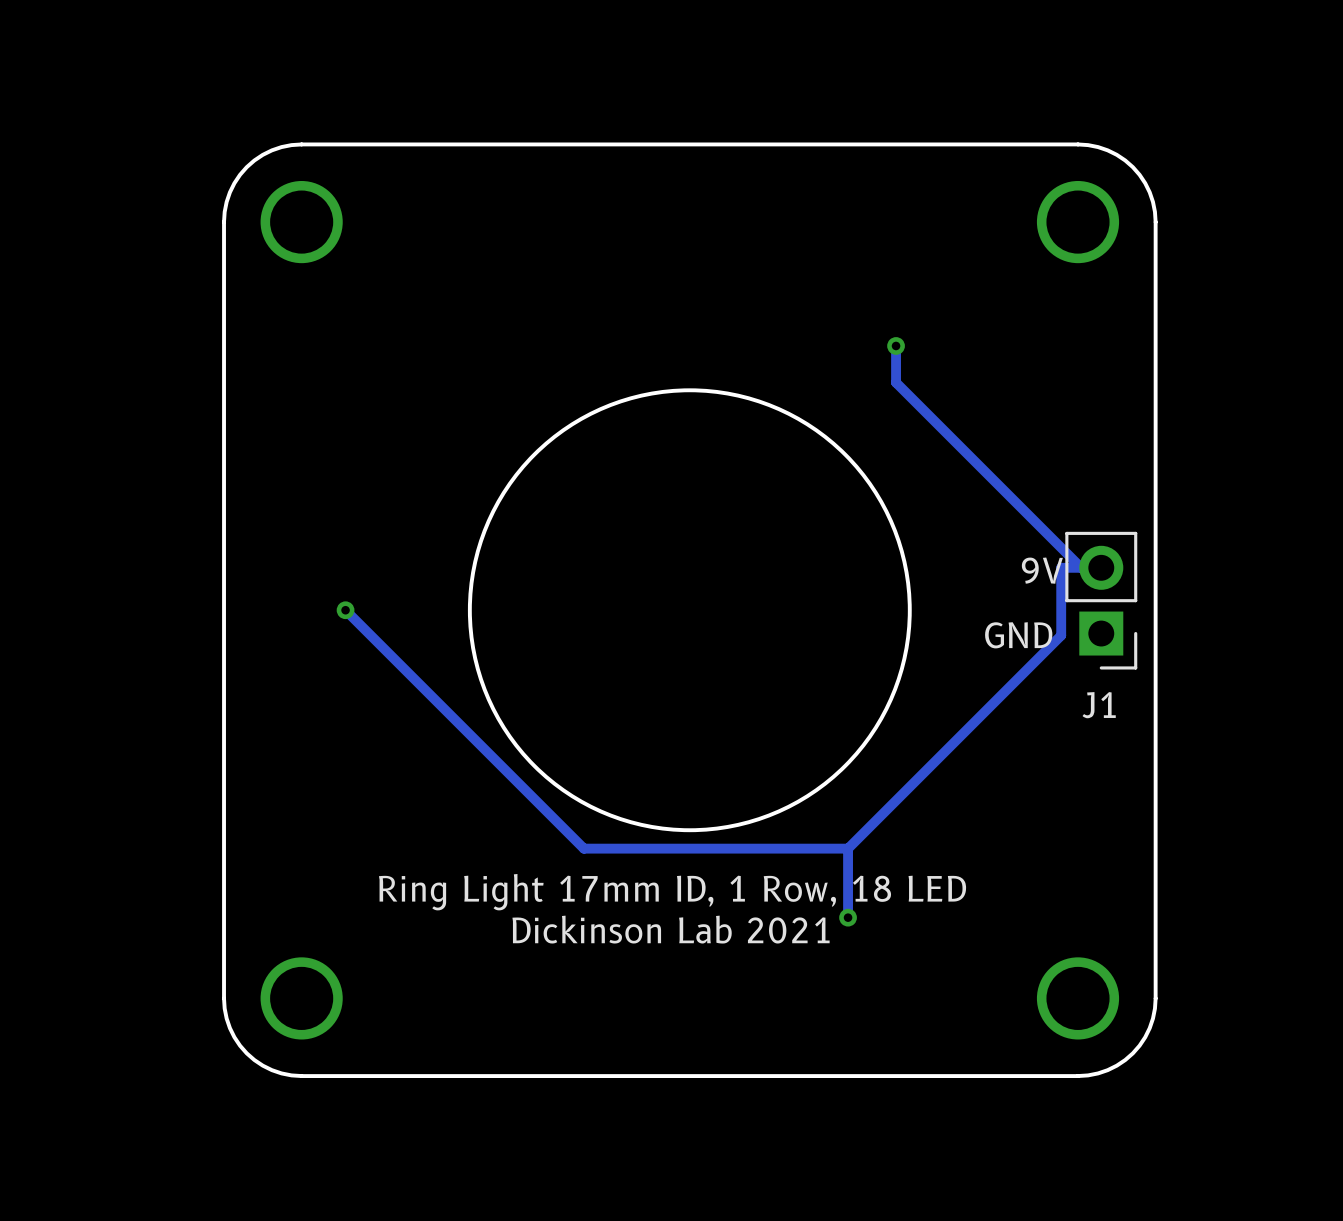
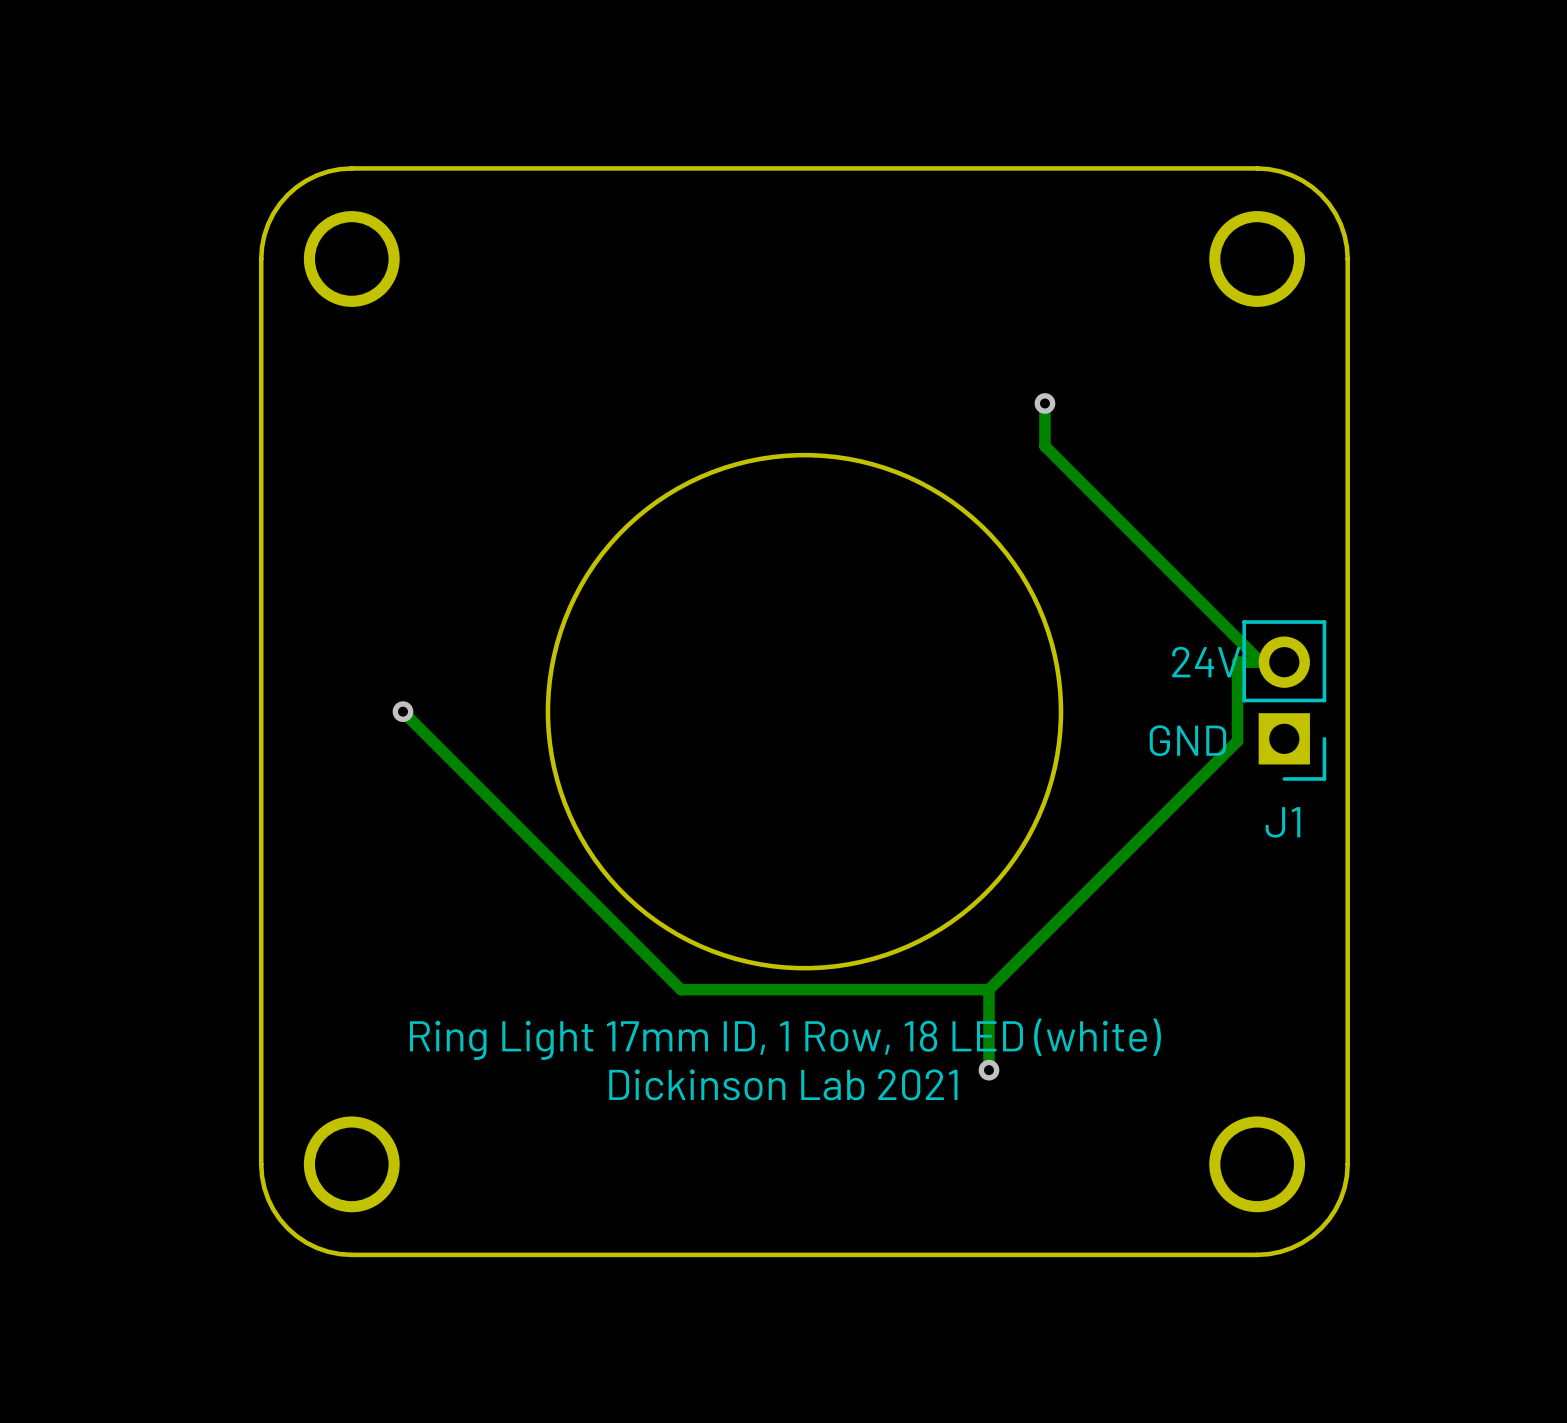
text: 9V (1042, 570) -> 24V (1206, 662)
text: Ring Light 17mm ID, 1 Row, 18 LED (672, 892) -> Ring Light 17mm ID, 1 Row, 18 LED (white) (785, 1039)

